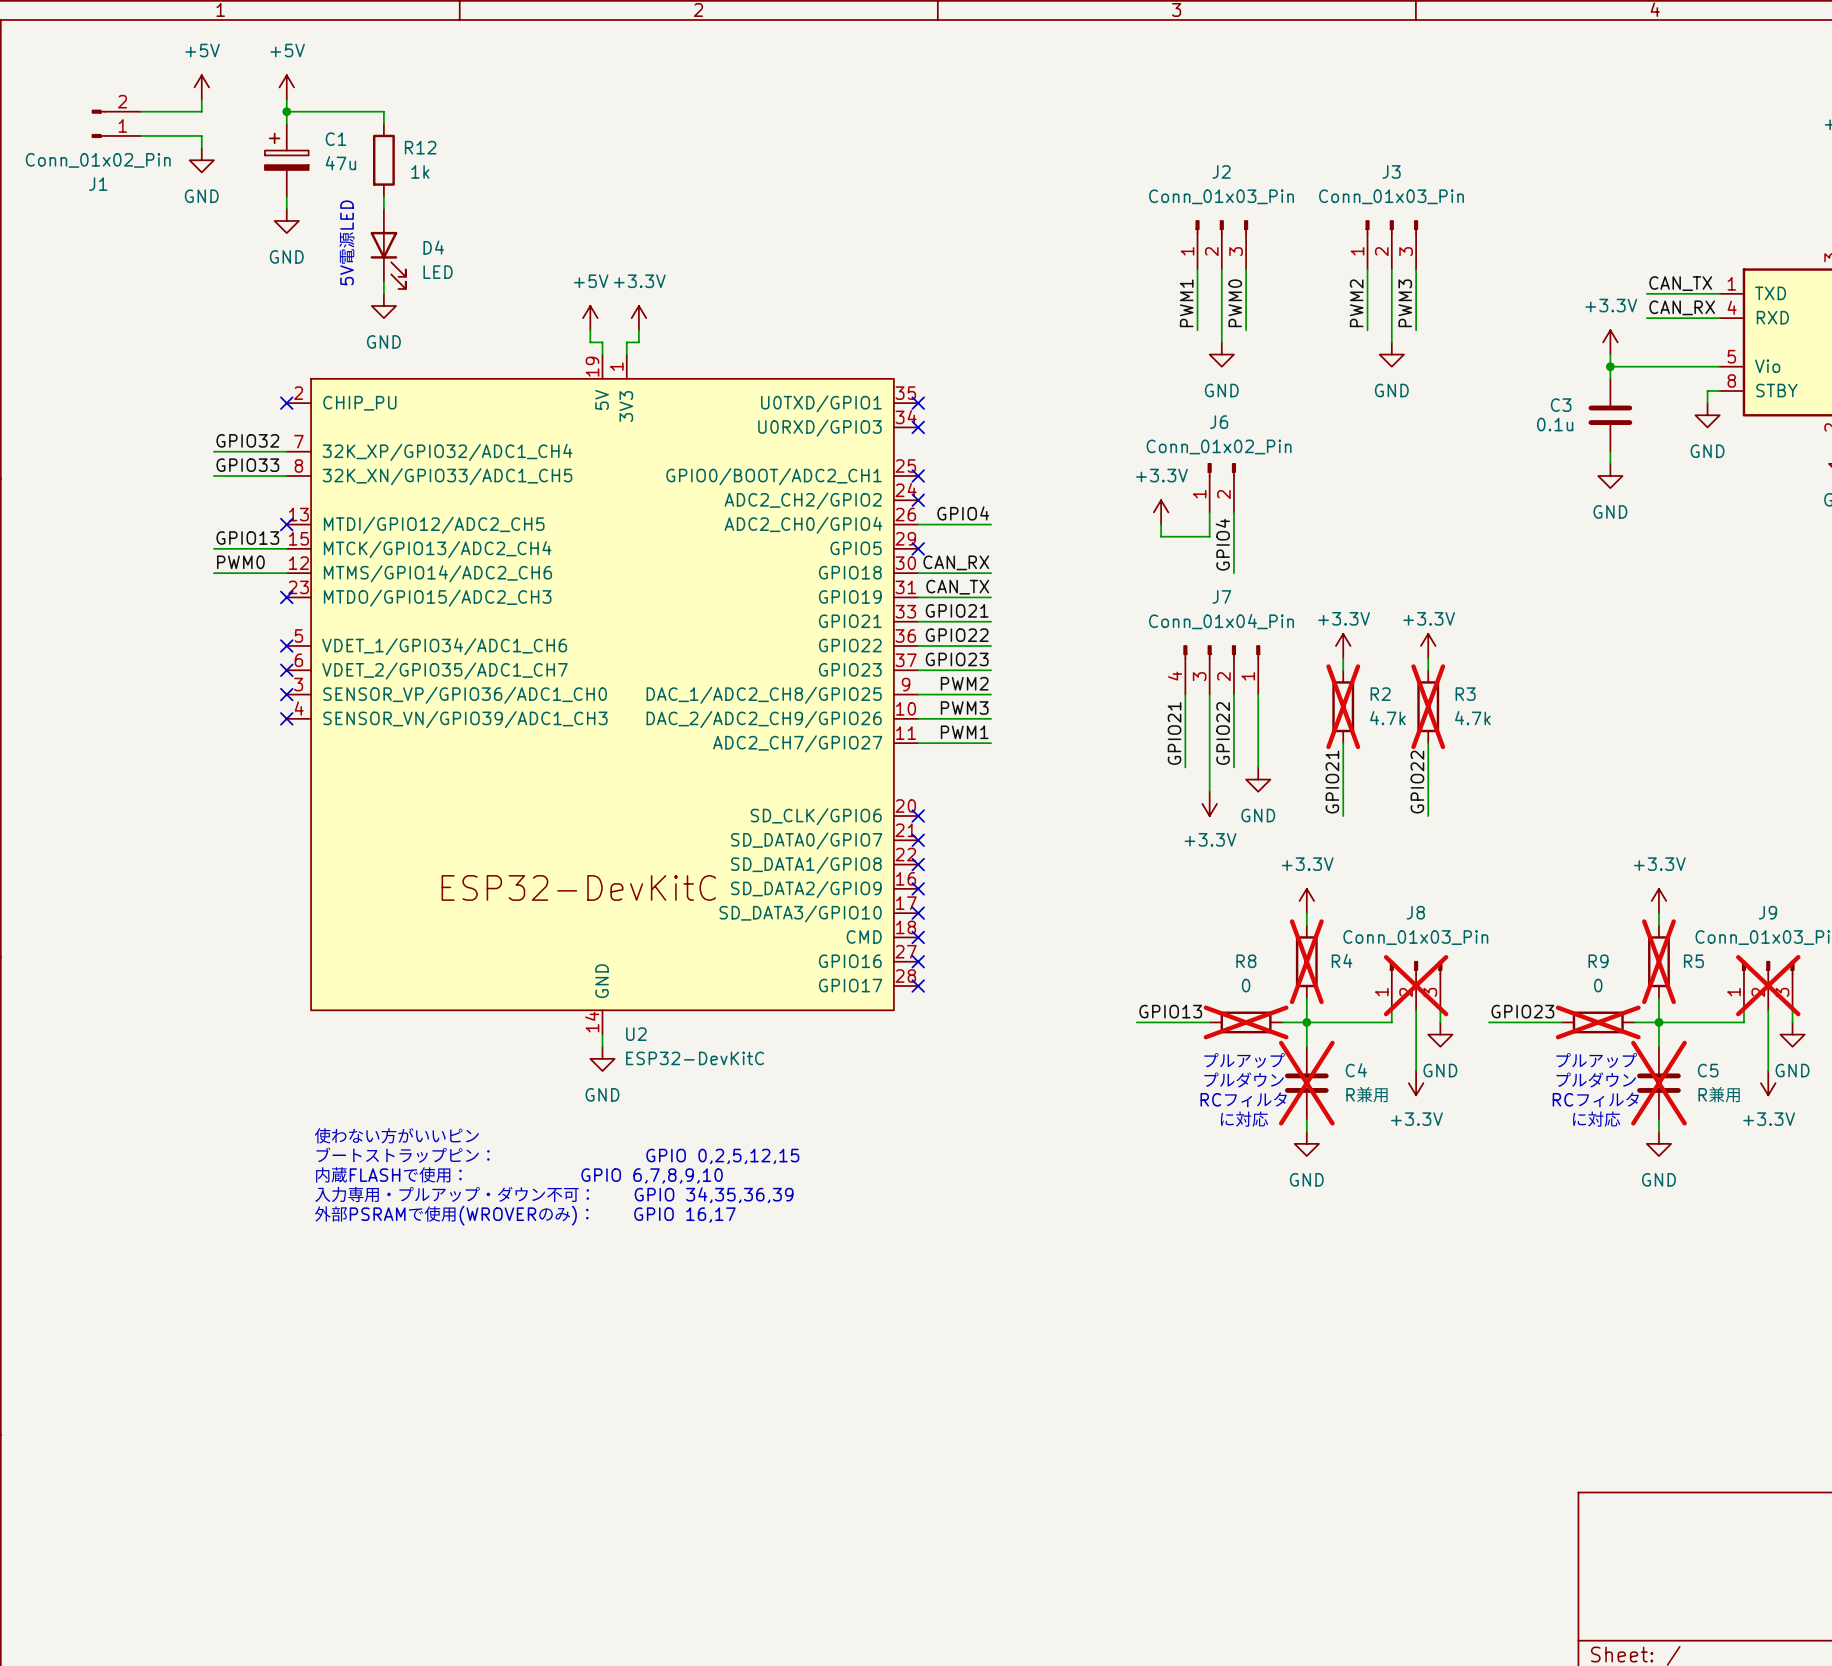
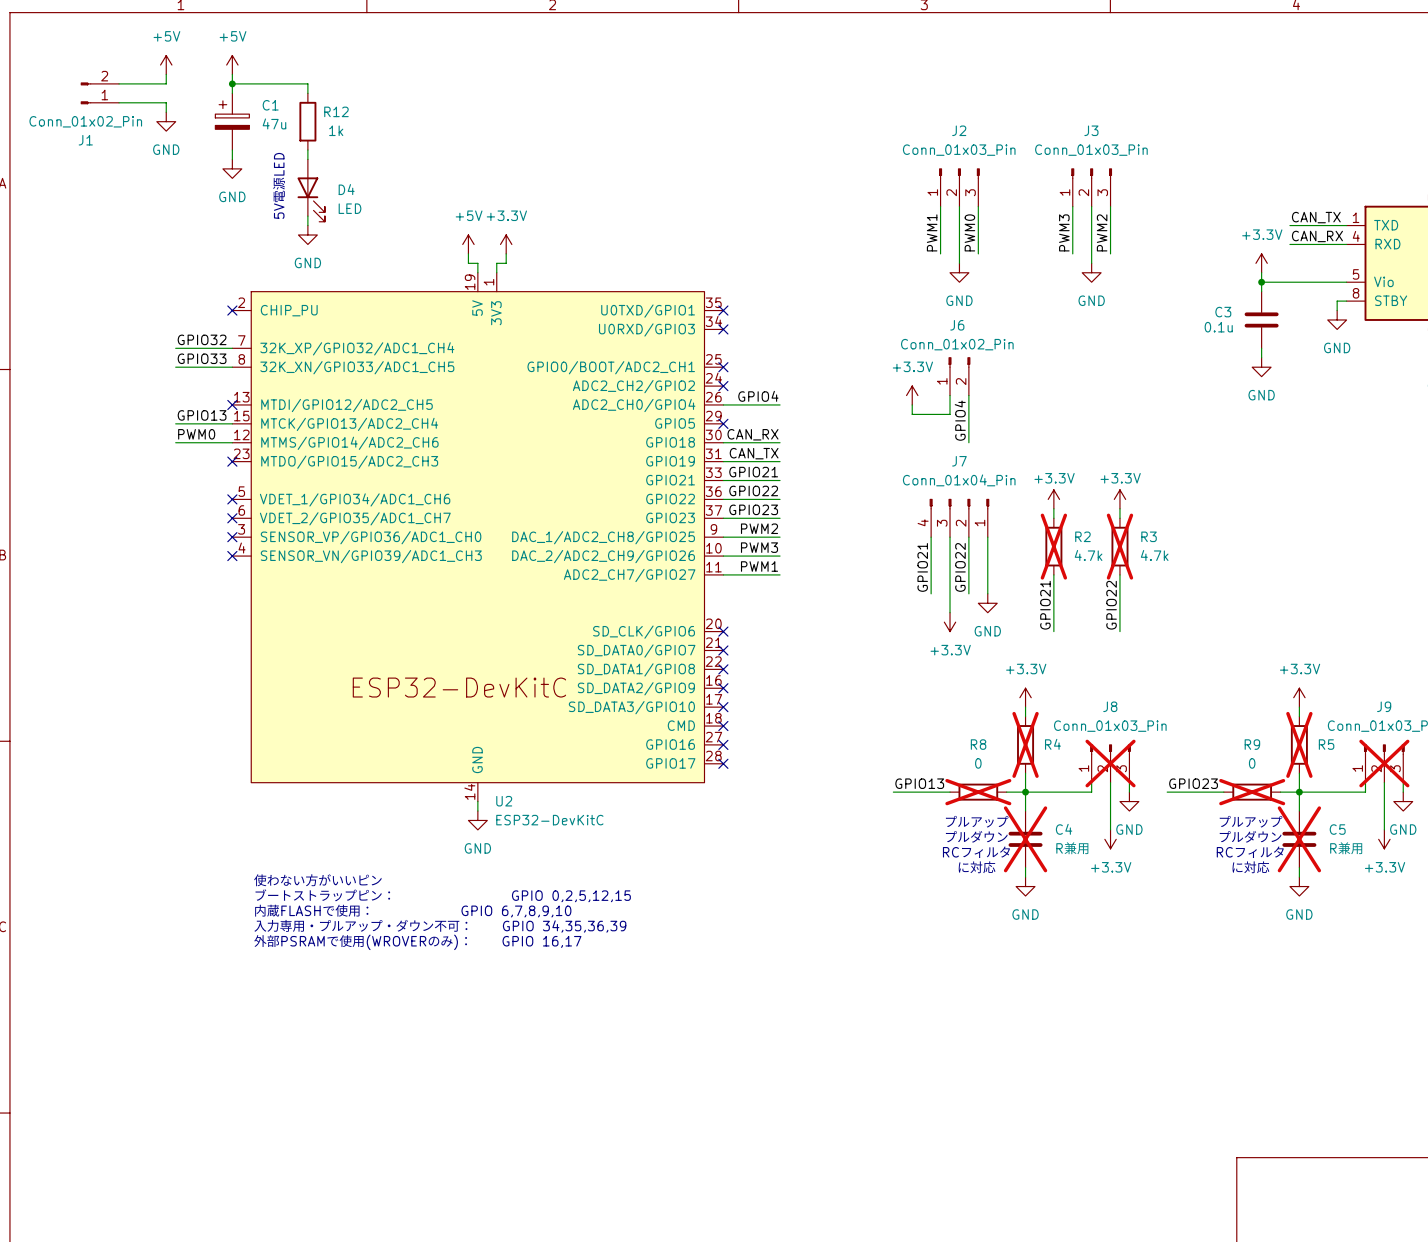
label: PWM2 (1356, 303) -> PWM3 (1064, 232)
label: PWM3 (1405, 303) -> PWM2 (1102, 232)

